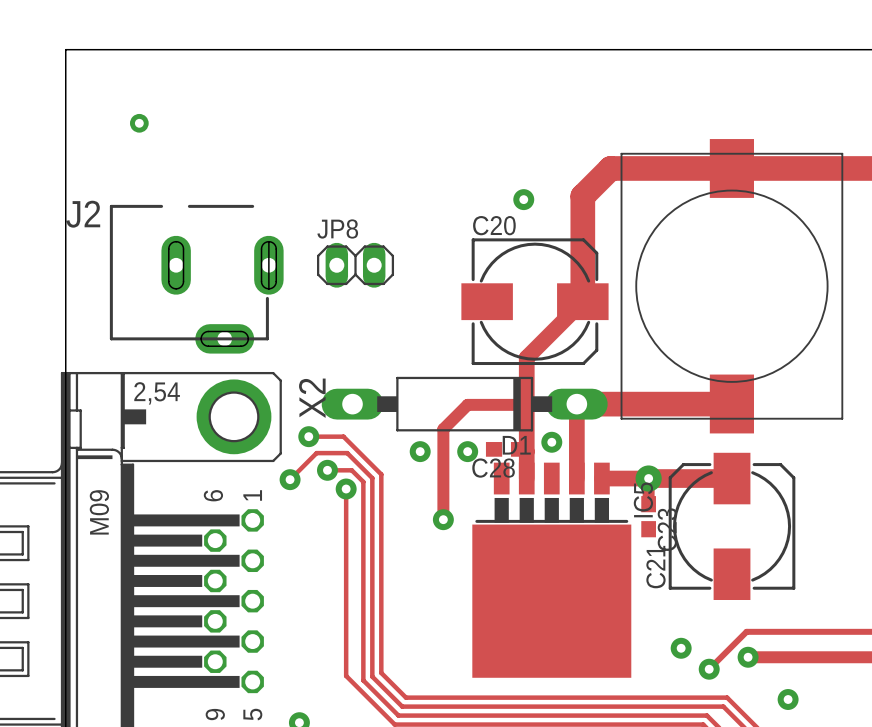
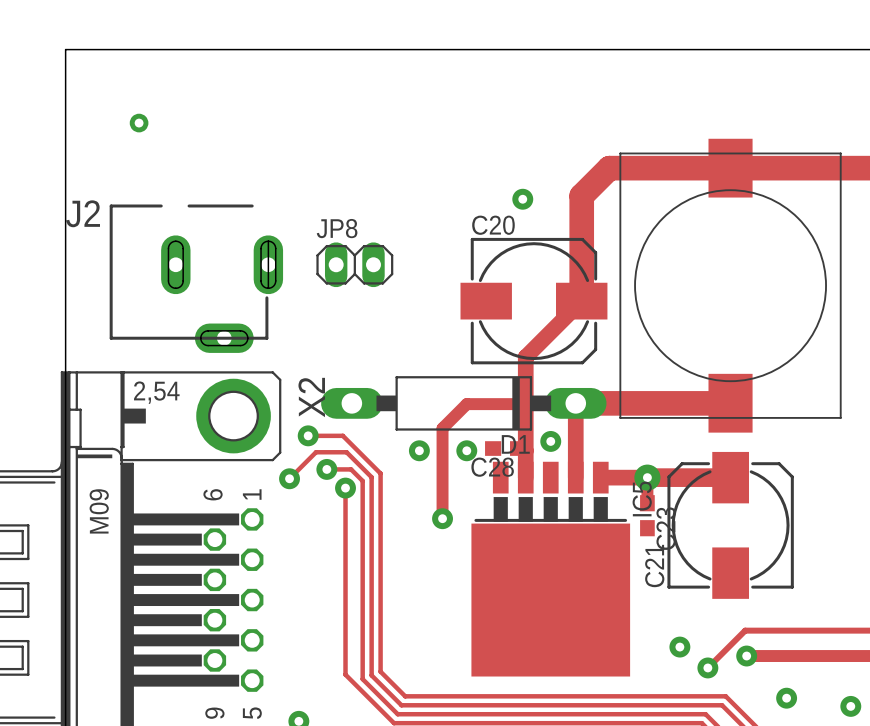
via: none -> (850, 706)

